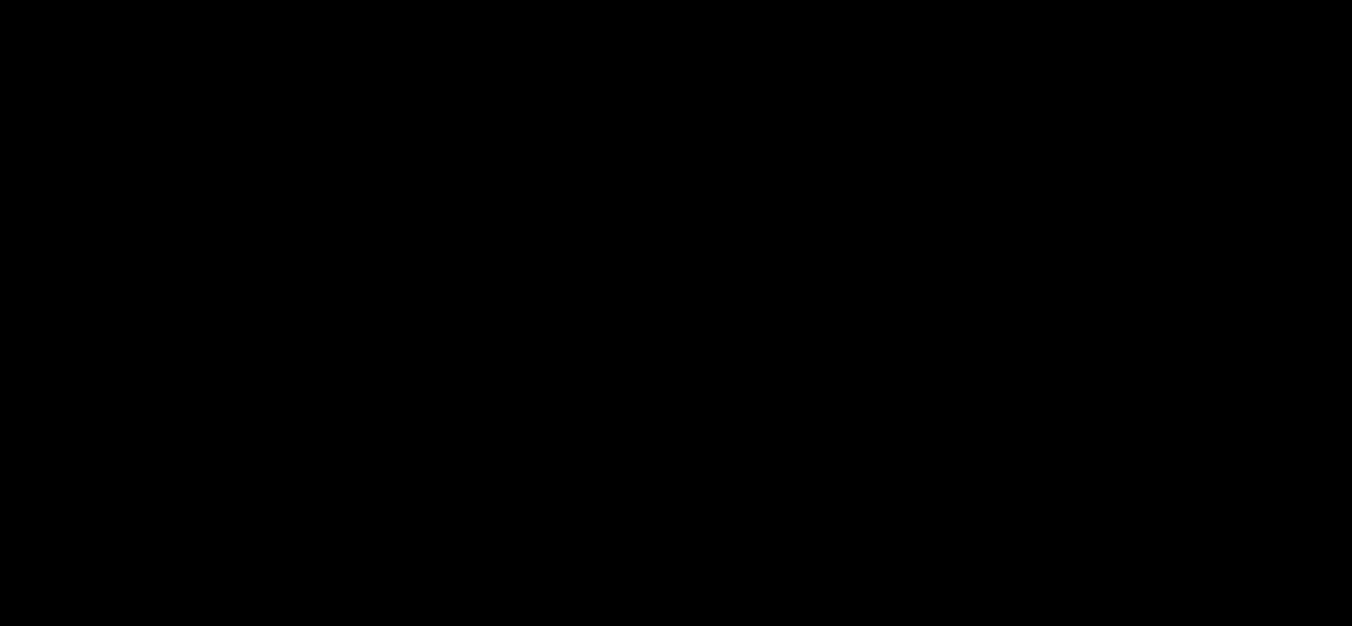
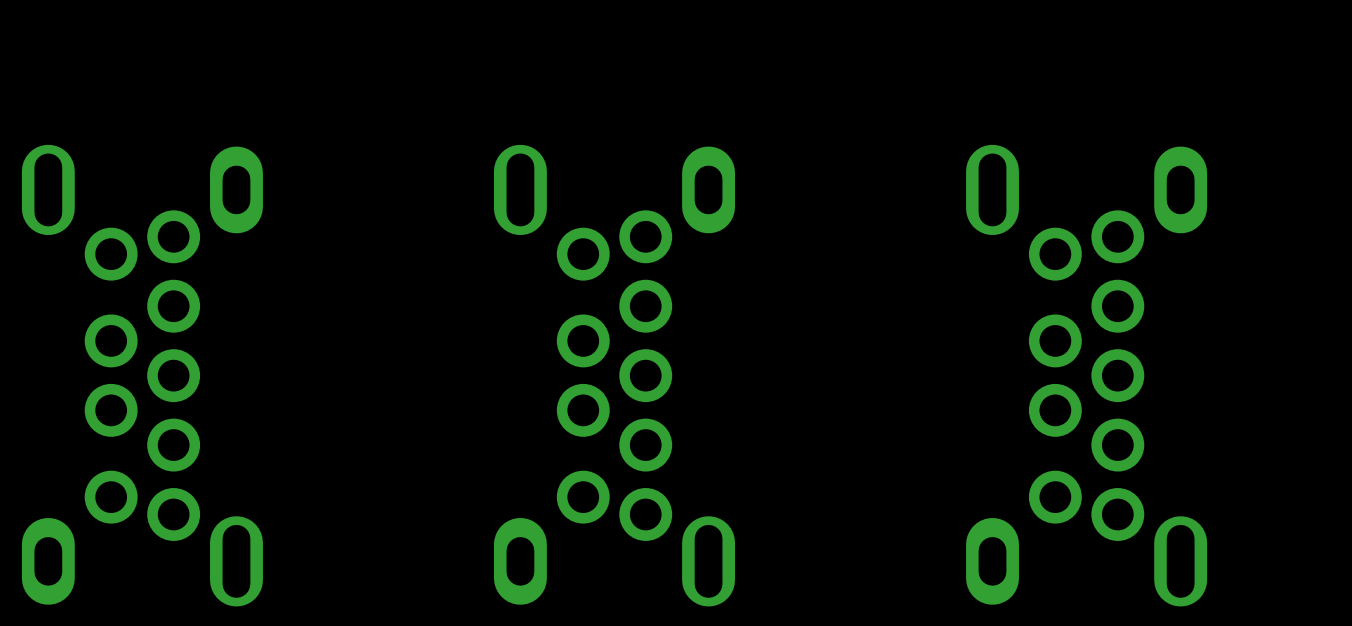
part: none -> (142, 375)
part: none -> (614, 375)
part: none -> (1086, 375)

